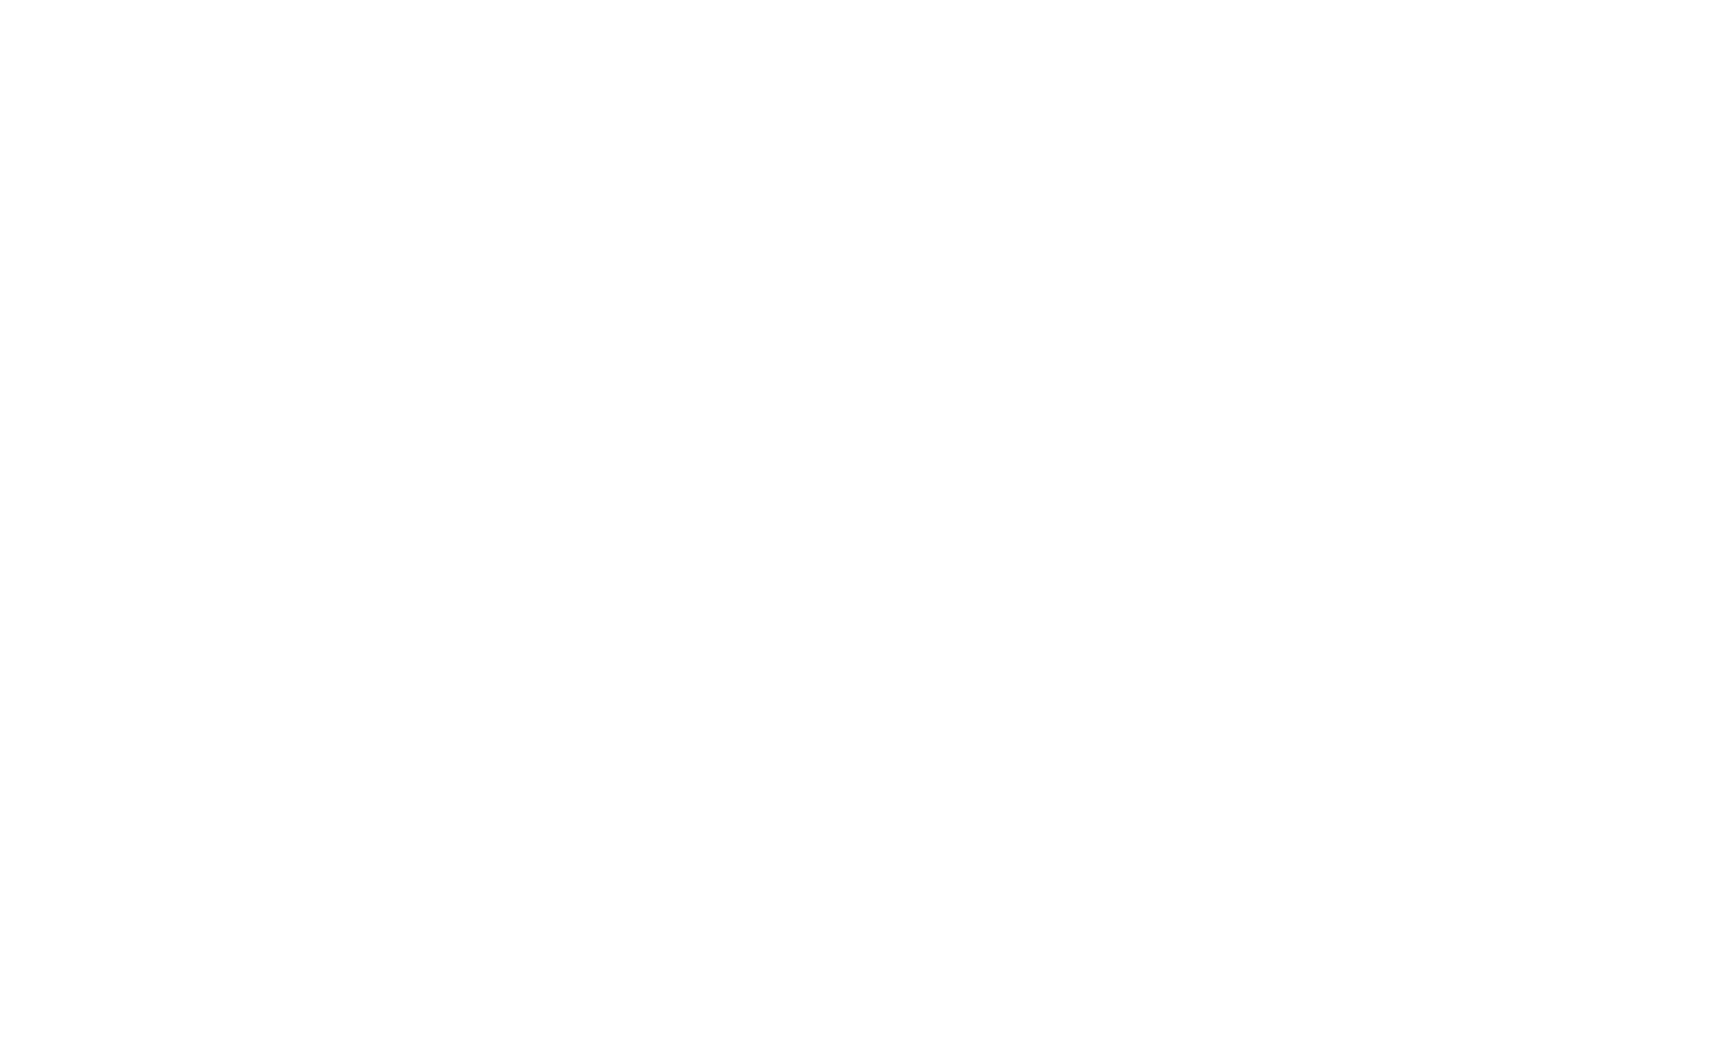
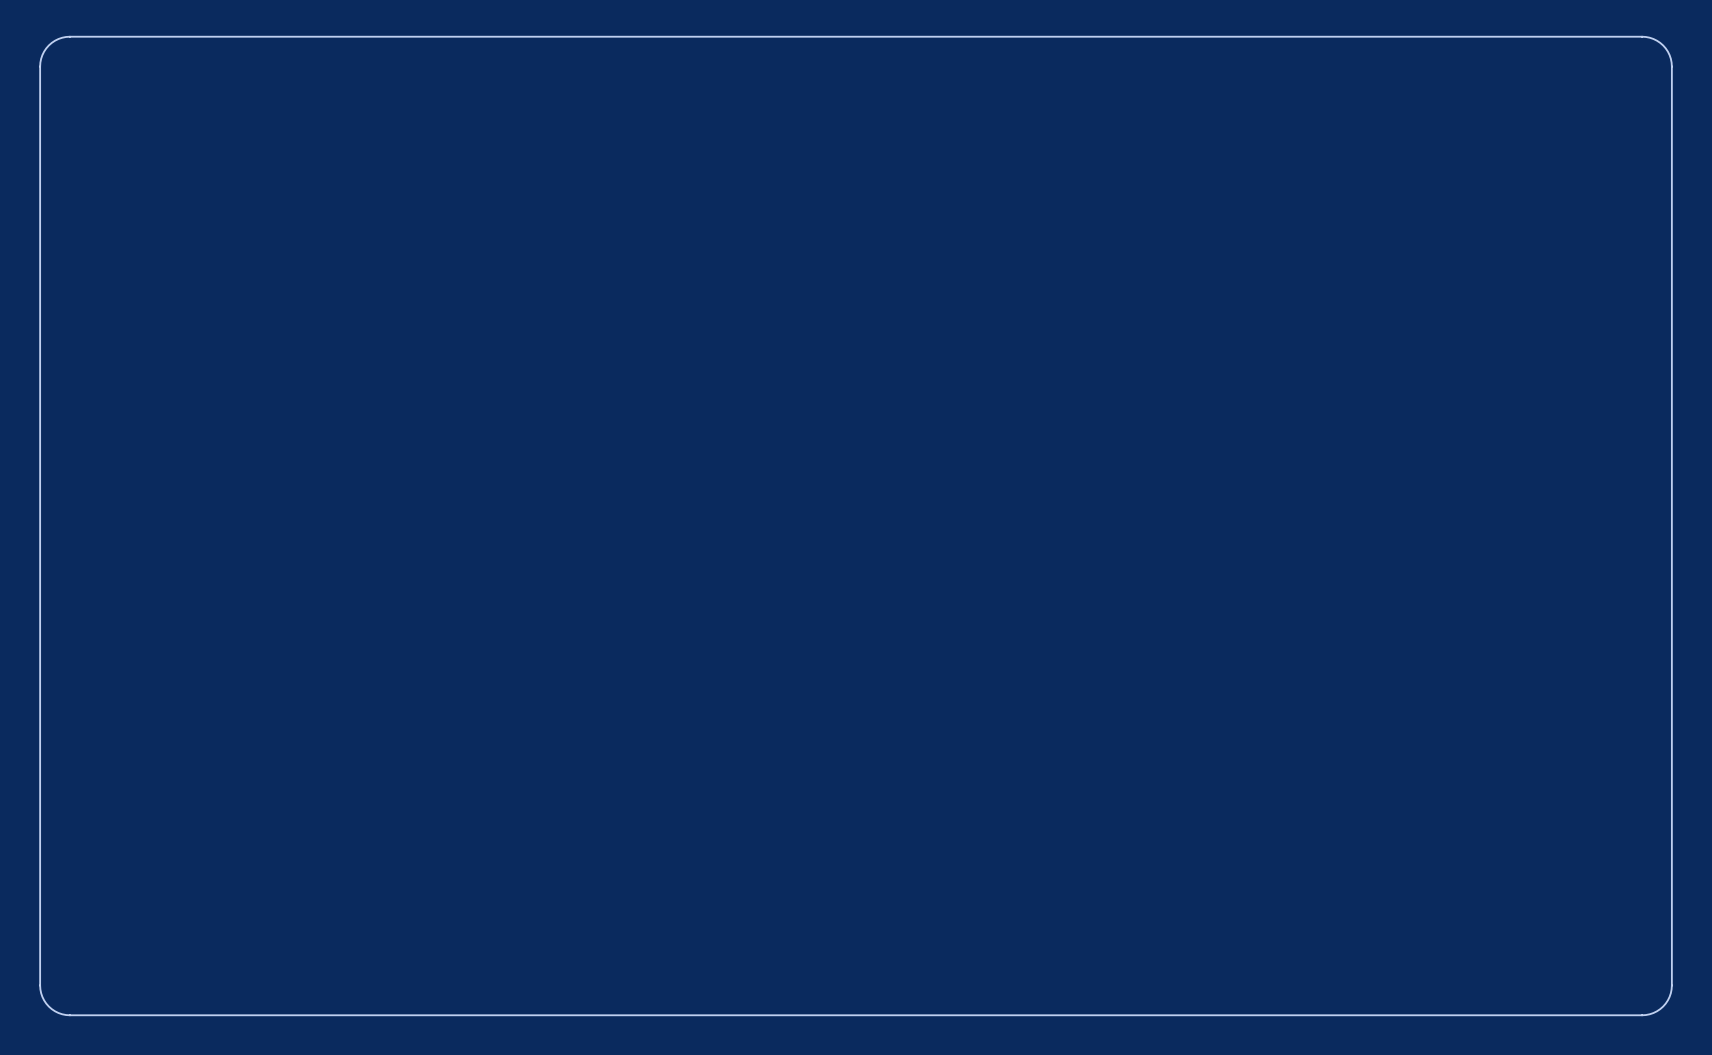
board edge: none -> (69, 36) (1642, 36) (1656, 40) (1667, 51) (1671, 66) (1671, 985) (1667, 1000) (1656, 1011) (1642, 1015) (69, 1015) (55, 1011) (44, 1000) (40, 985) (40, 66) (42, 55) (48, 45) (58, 38) (69, 36)

